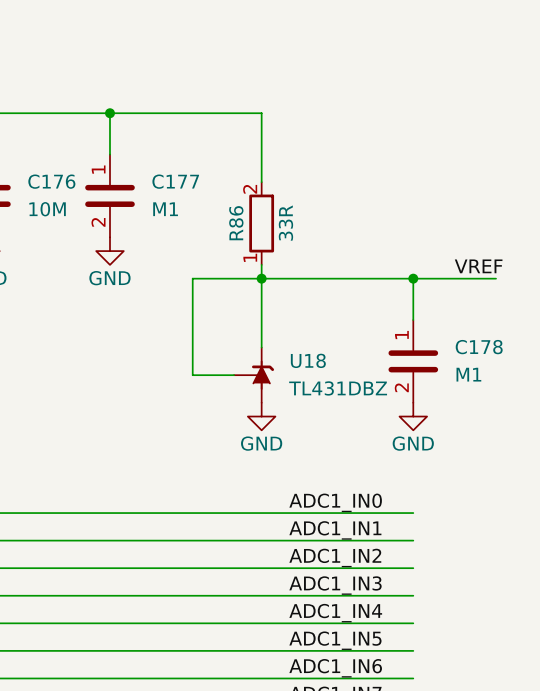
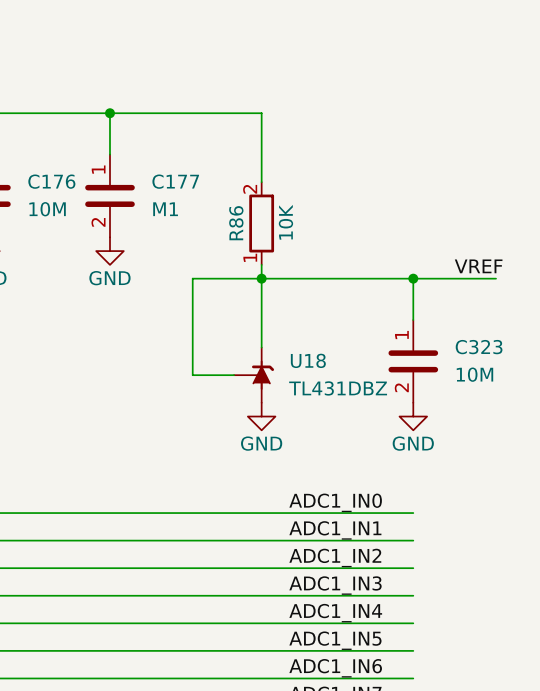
R86 value: 33R (285, 223) -> 10K (285, 222)
C178 name: C178 (479, 347) -> C323 (479, 347)
C178 value: M1 (468, 374) -> 10M (474, 374)

